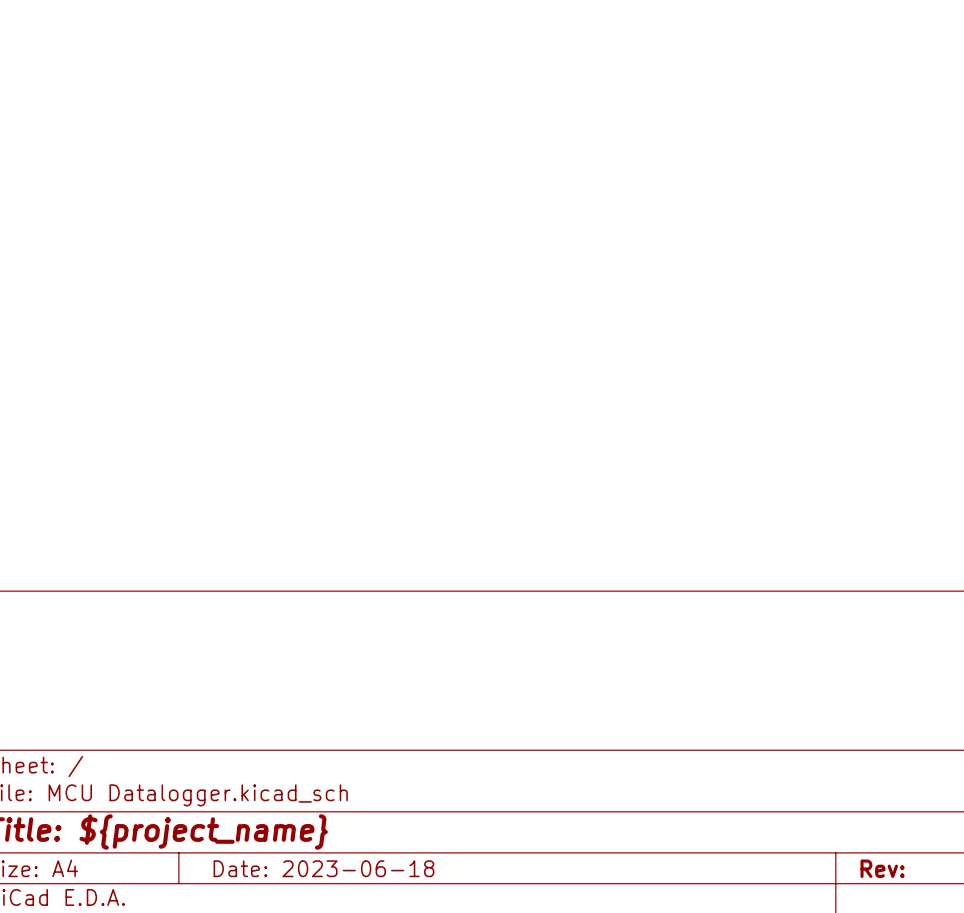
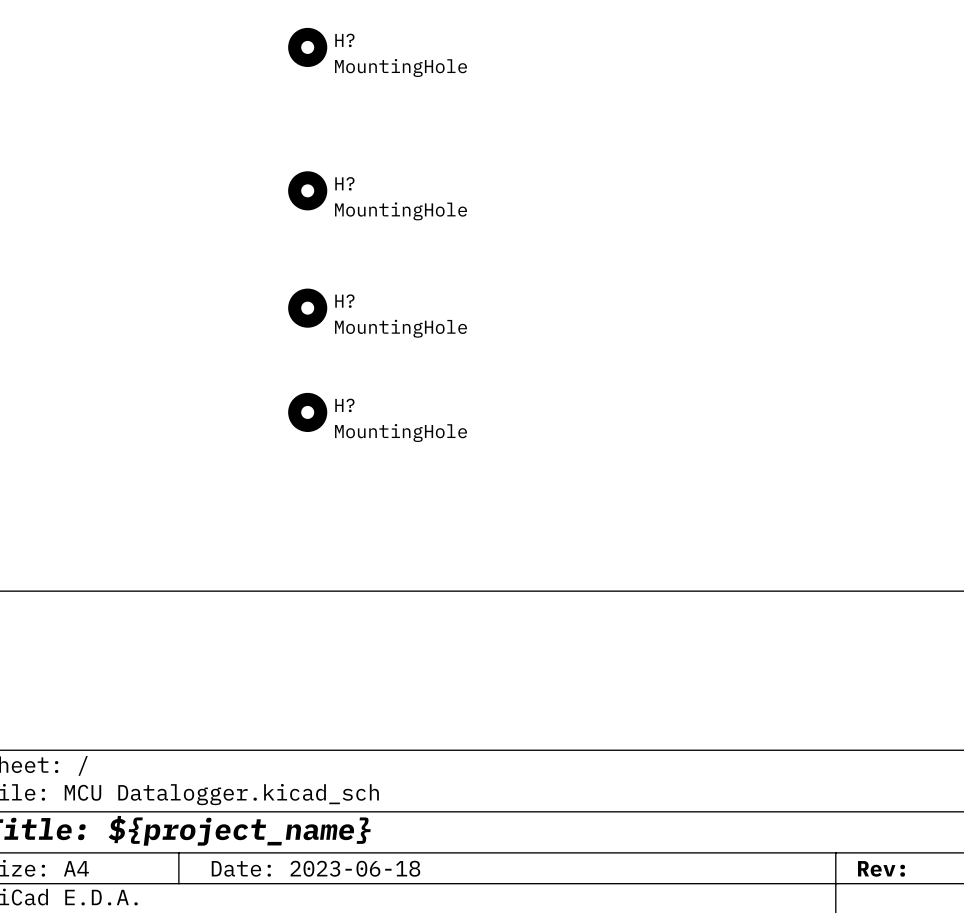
H?: none -> MountingHole (307, 47)
H?: none -> MountingHole (307, 190)
H?: none -> MountingHole (307, 308)
H?: none -> MountingHole (307, 412)

